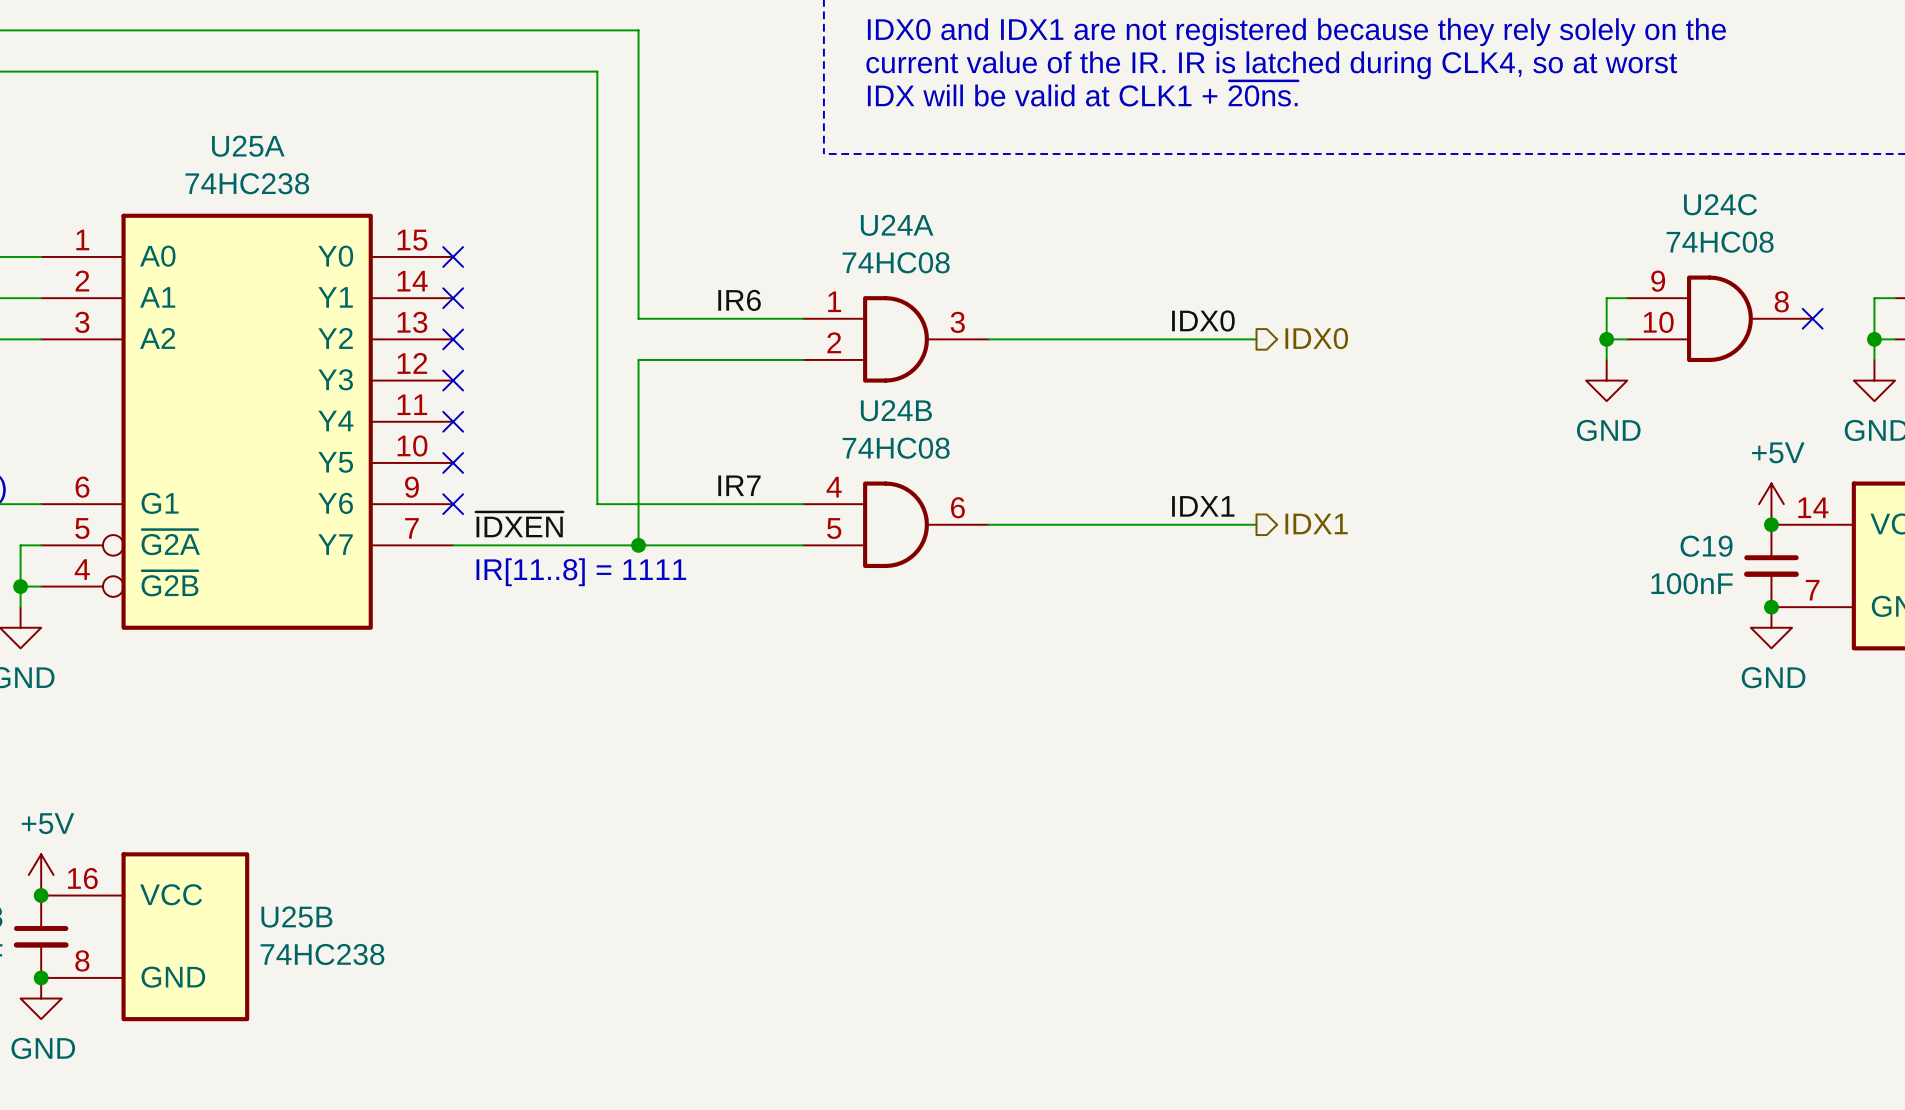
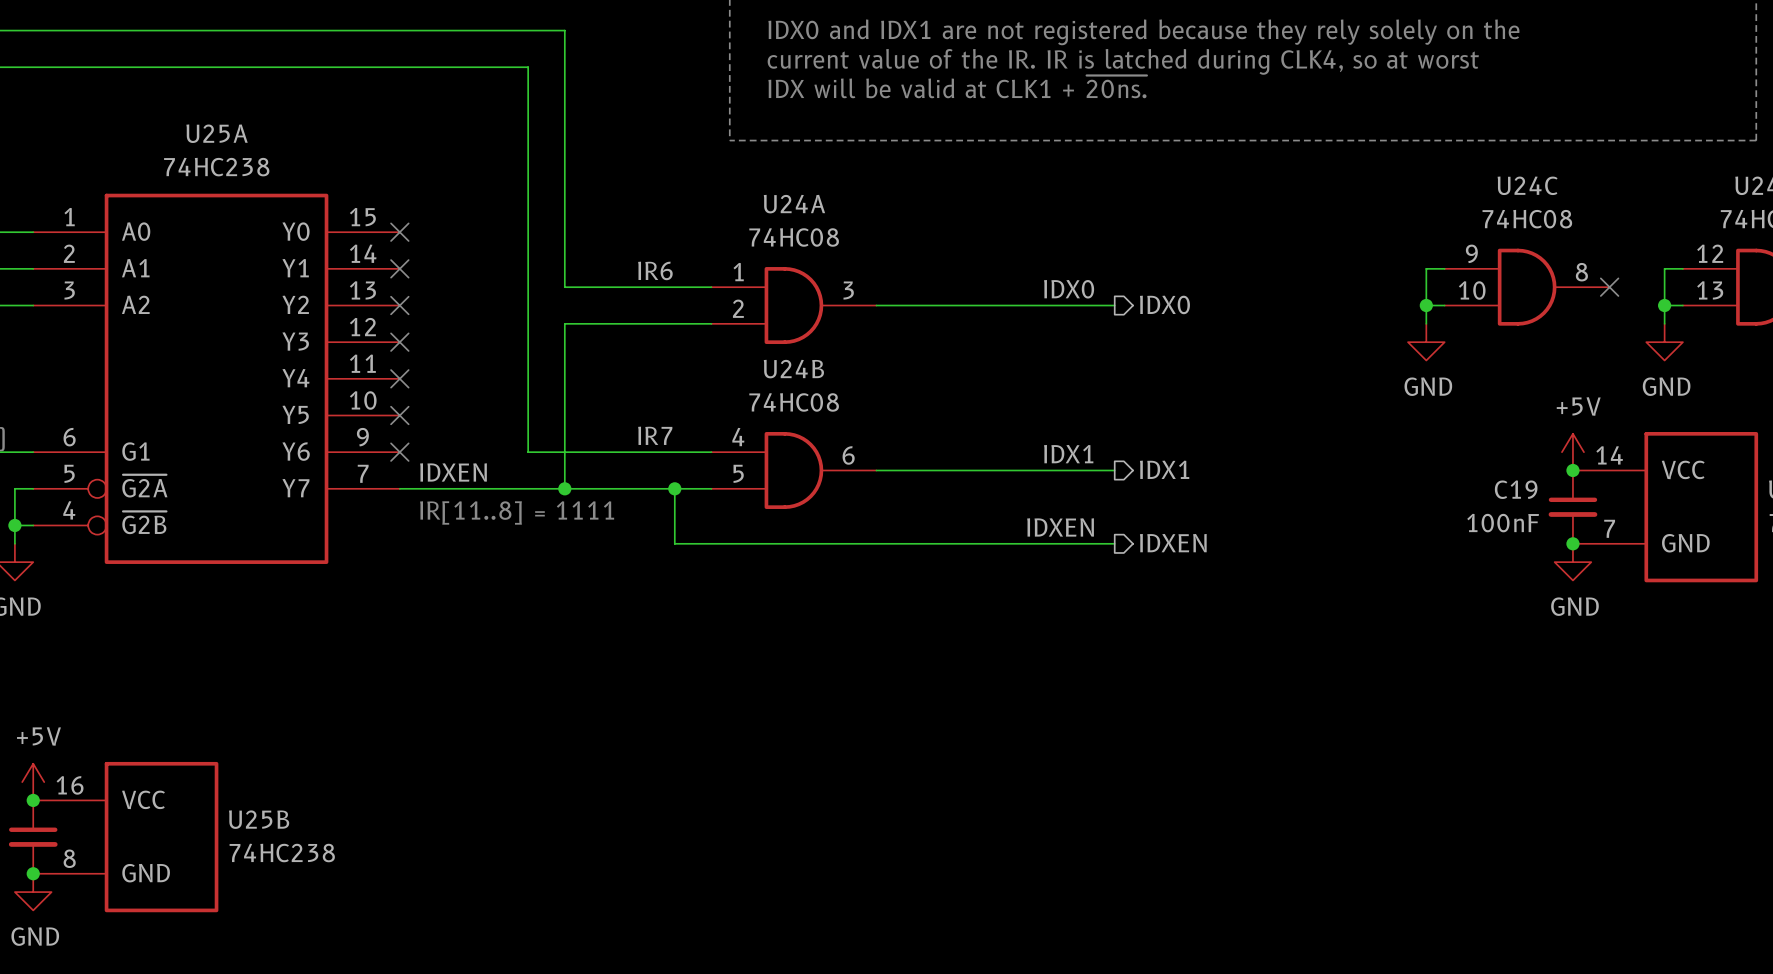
label: ~{IDXEN} (519, 524) -> IDXEN (453, 472)
wire: none -> (674, 488) (674, 543) (1114, 543)
junction: none -> (674, 488)
label: none -> IDXEN (1060, 527)
hierarchical label: none -> IDXEN (1173, 543)

